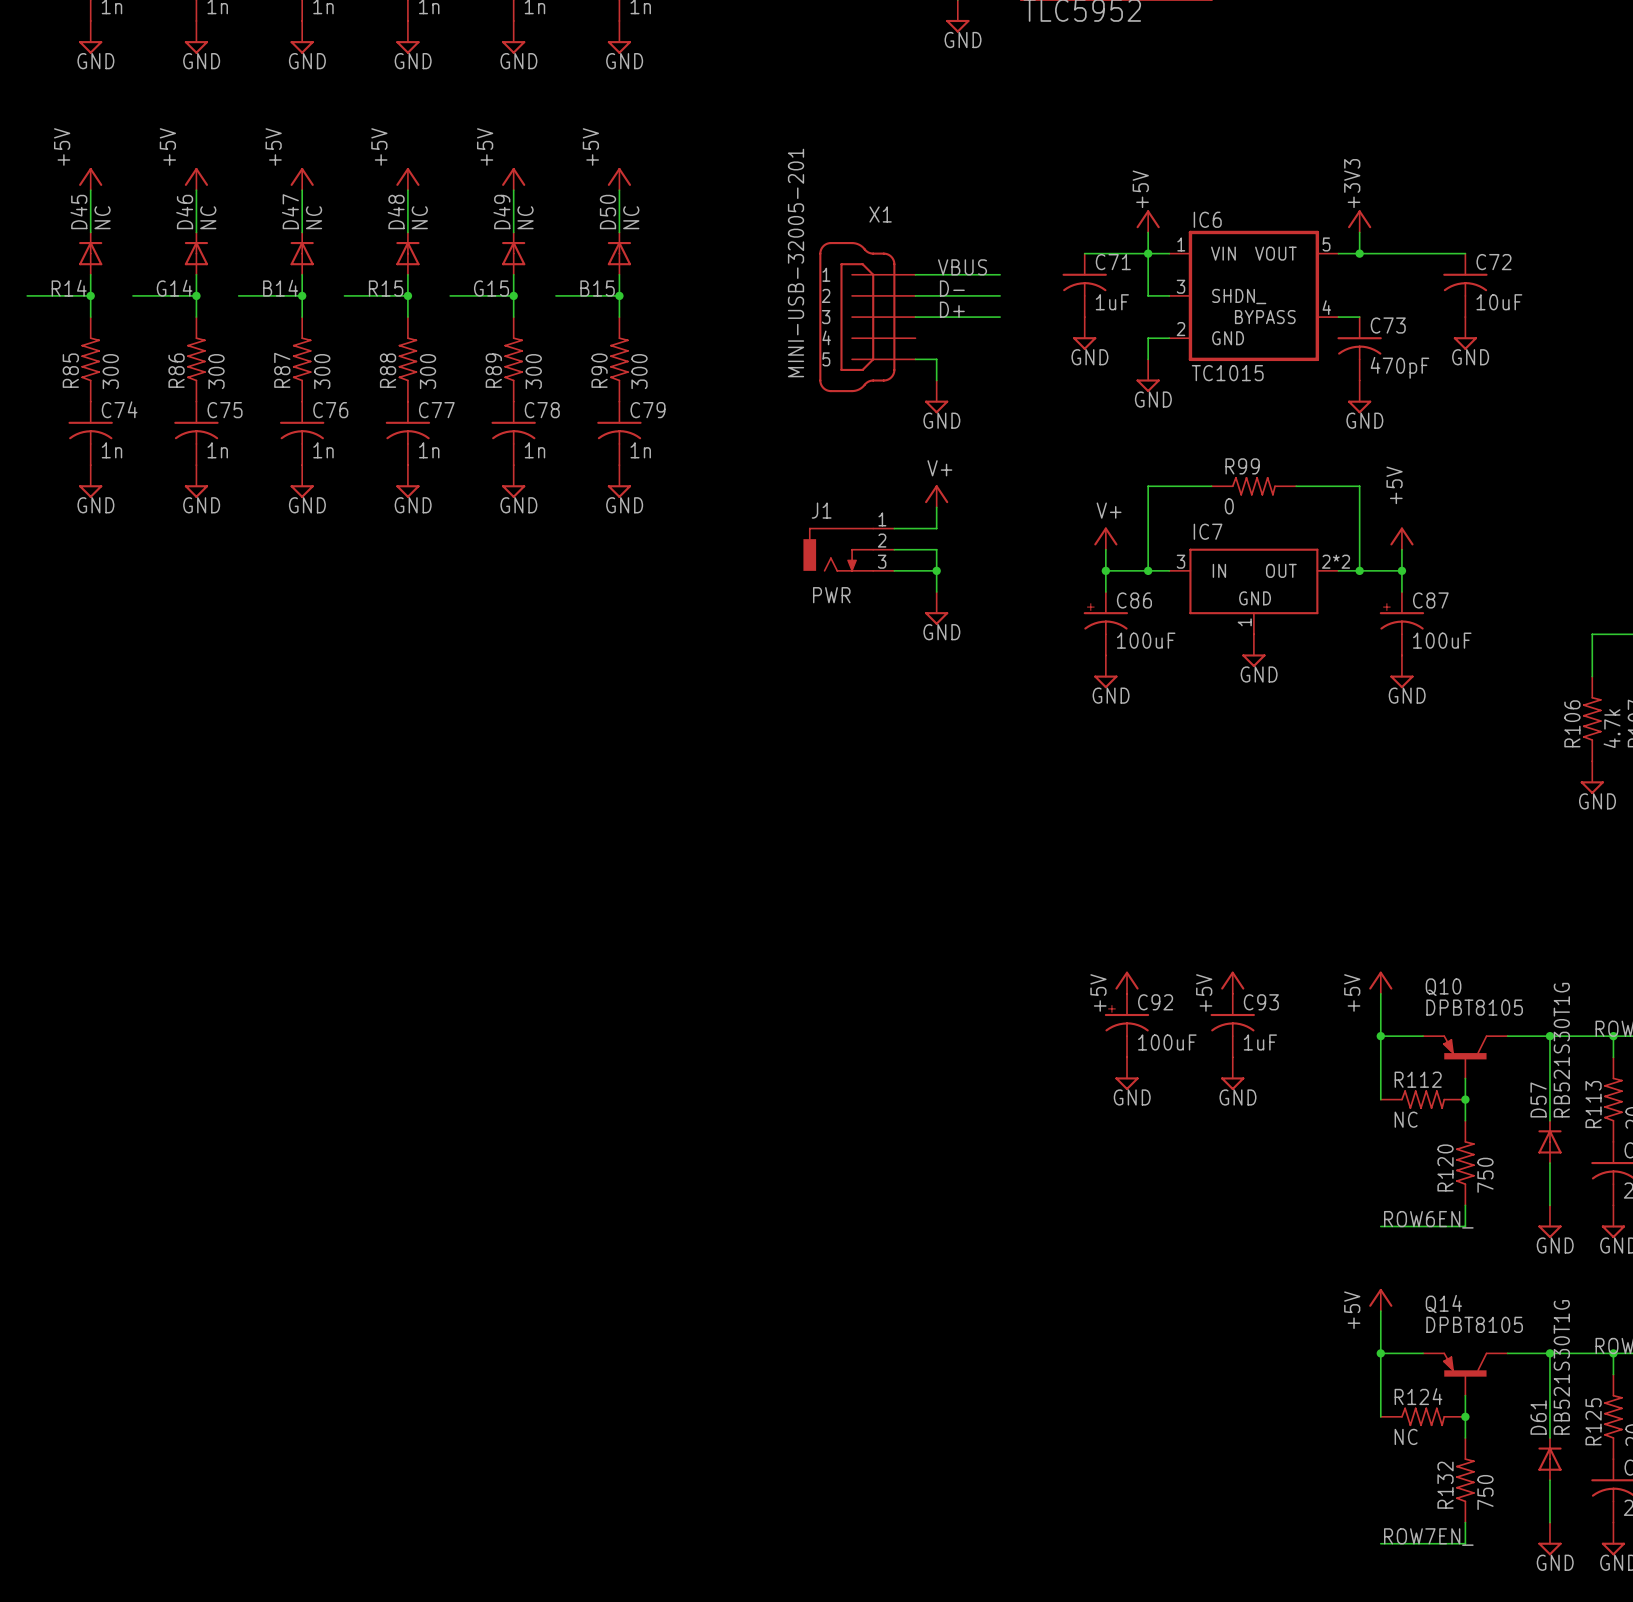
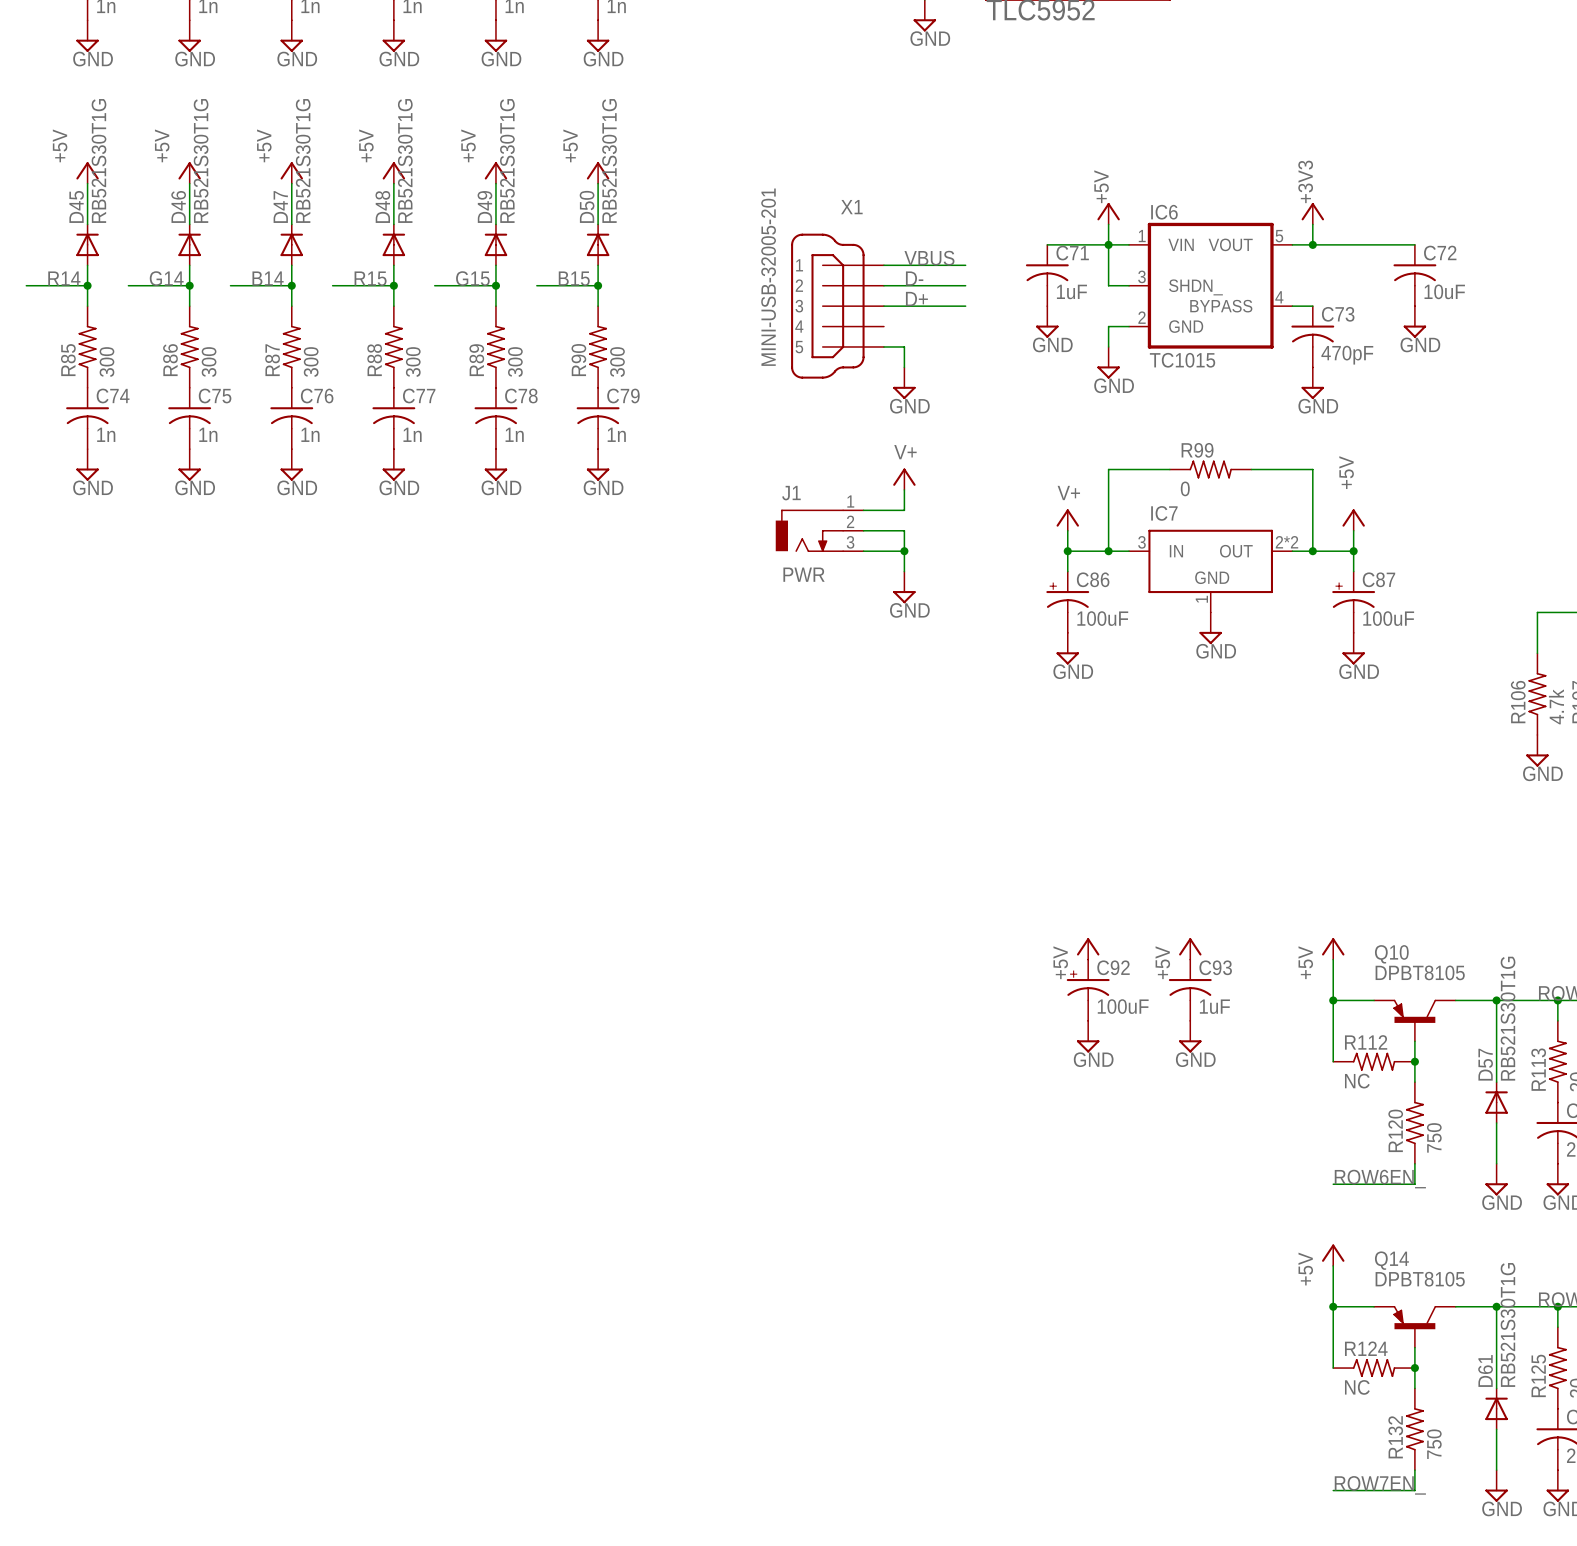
D45 value: NC (102, 217) -> RB521S30T1G (98, 160)
D46 value: NC (208, 217) -> RB521S30T1G (201, 160)
D47 value: NC (314, 217) -> RB521S30T1G (303, 160)
D48 value: NC (419, 217) -> RB521S30T1G (405, 160)
D49 value: NC (525, 217) -> RB521S30T1G (507, 160)
D50 value: NC (631, 217) -> RB521S30T1G (609, 160)

